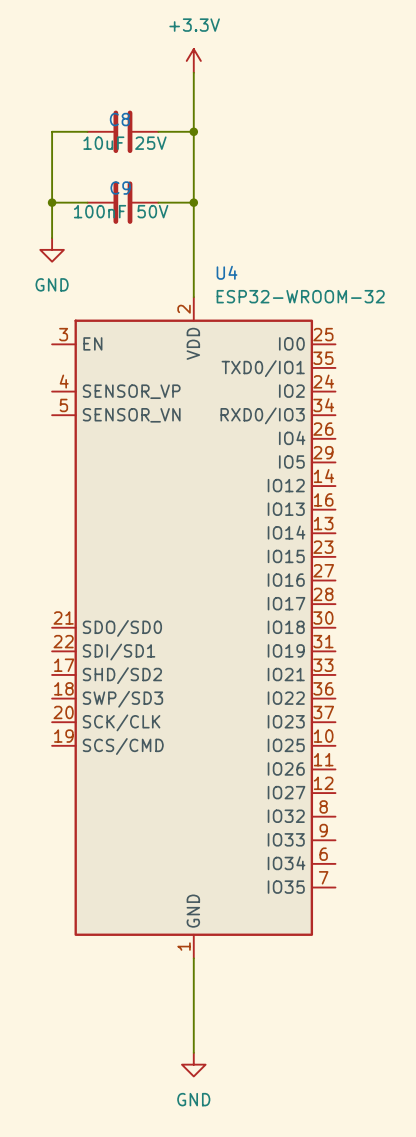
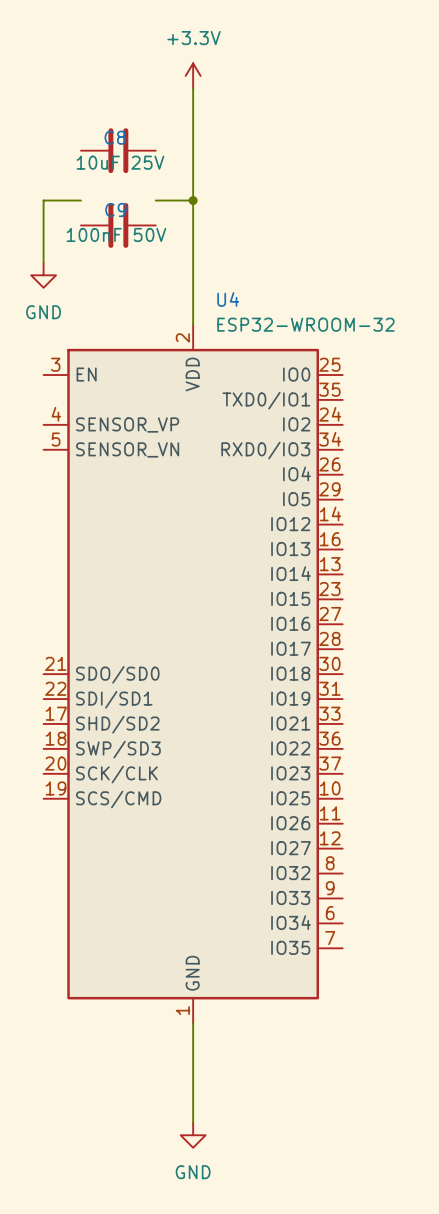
wire: (87, 131) (52, 131) (52, 179) -> (80, 200) (43, 200)
wire: (158, 131) (193, 131) -> none
junction: (193, 131) -> none
junction: none -> (193, 200)
wire: (52, 202) (87, 202) -> none
junction: (52, 202) -> none
wire: (158, 202) (193, 202) -> (155, 200) (193, 200)
junction: (193, 202) -> none

